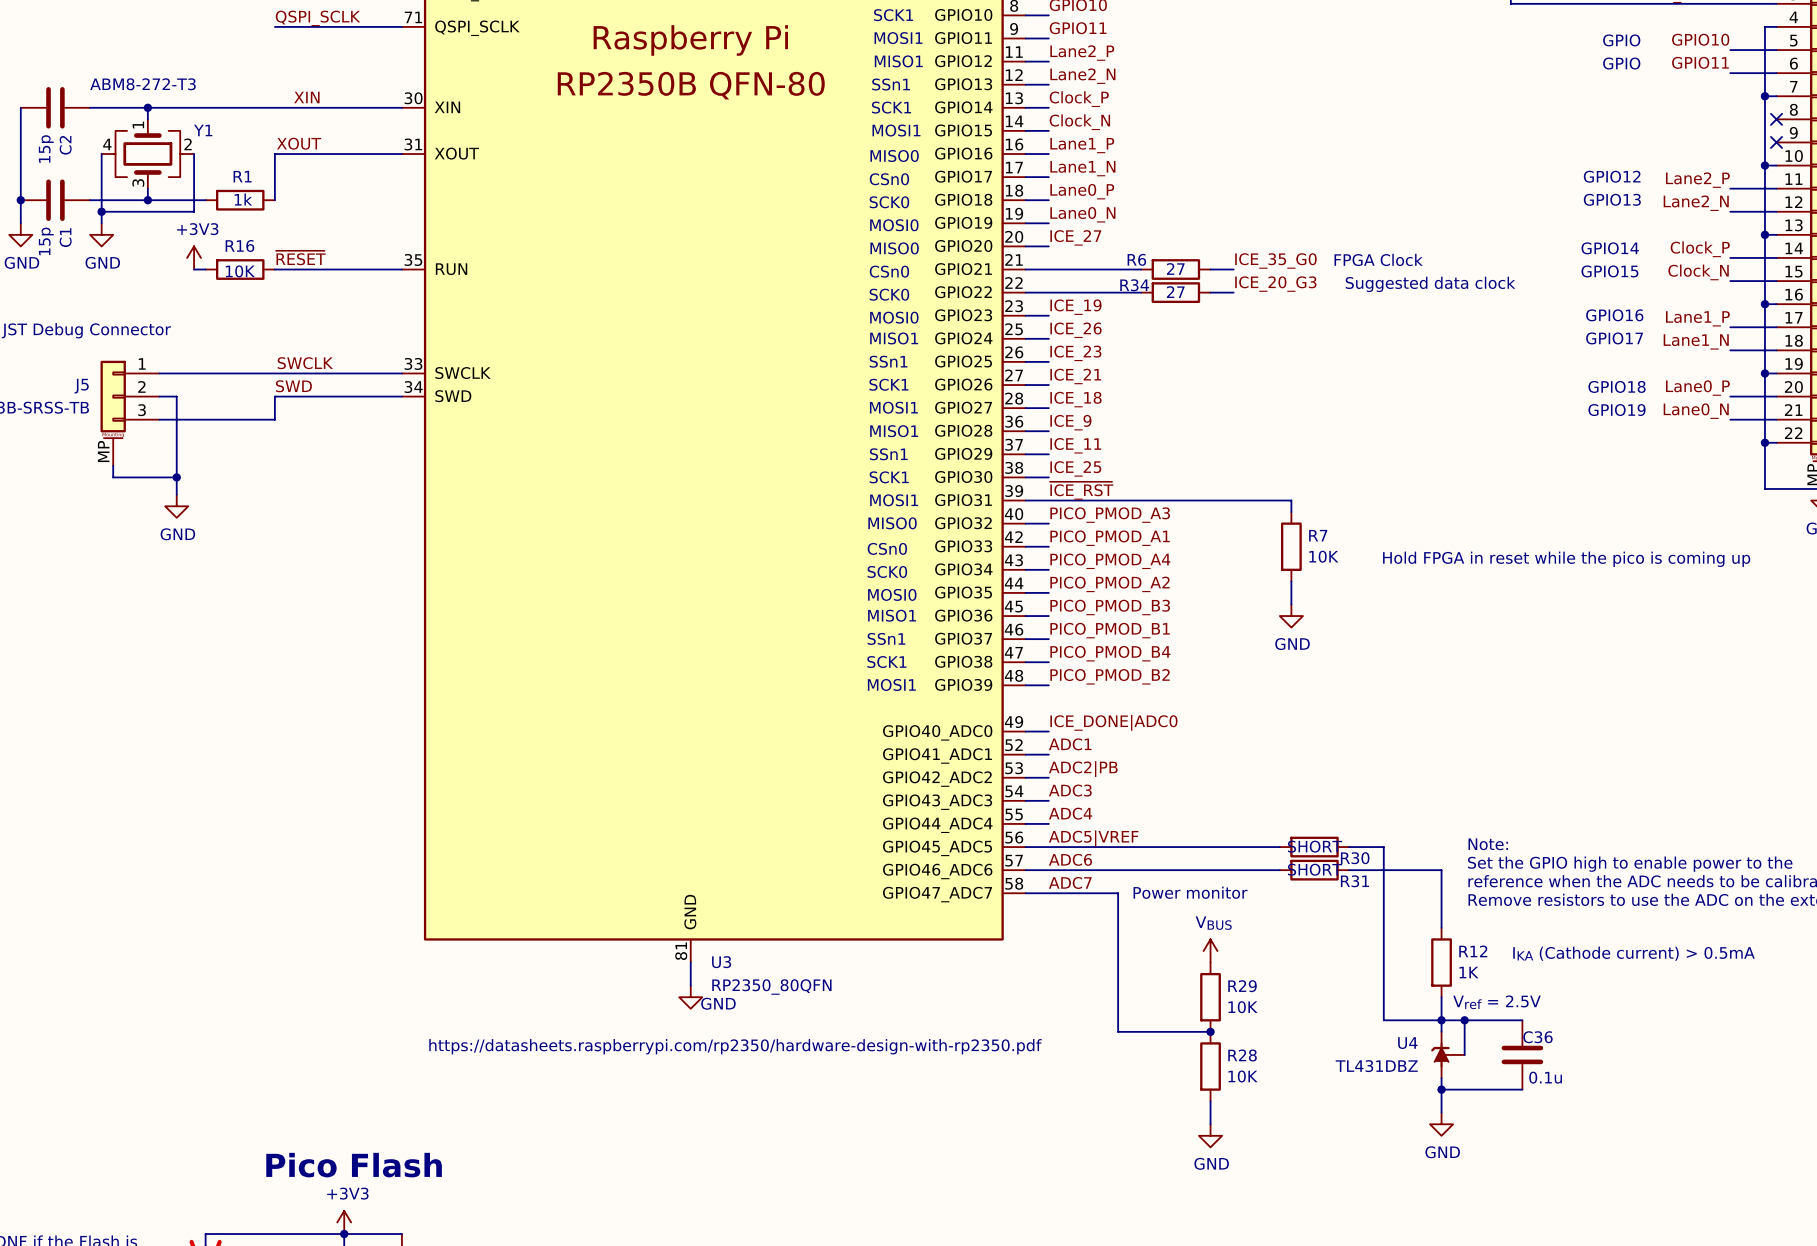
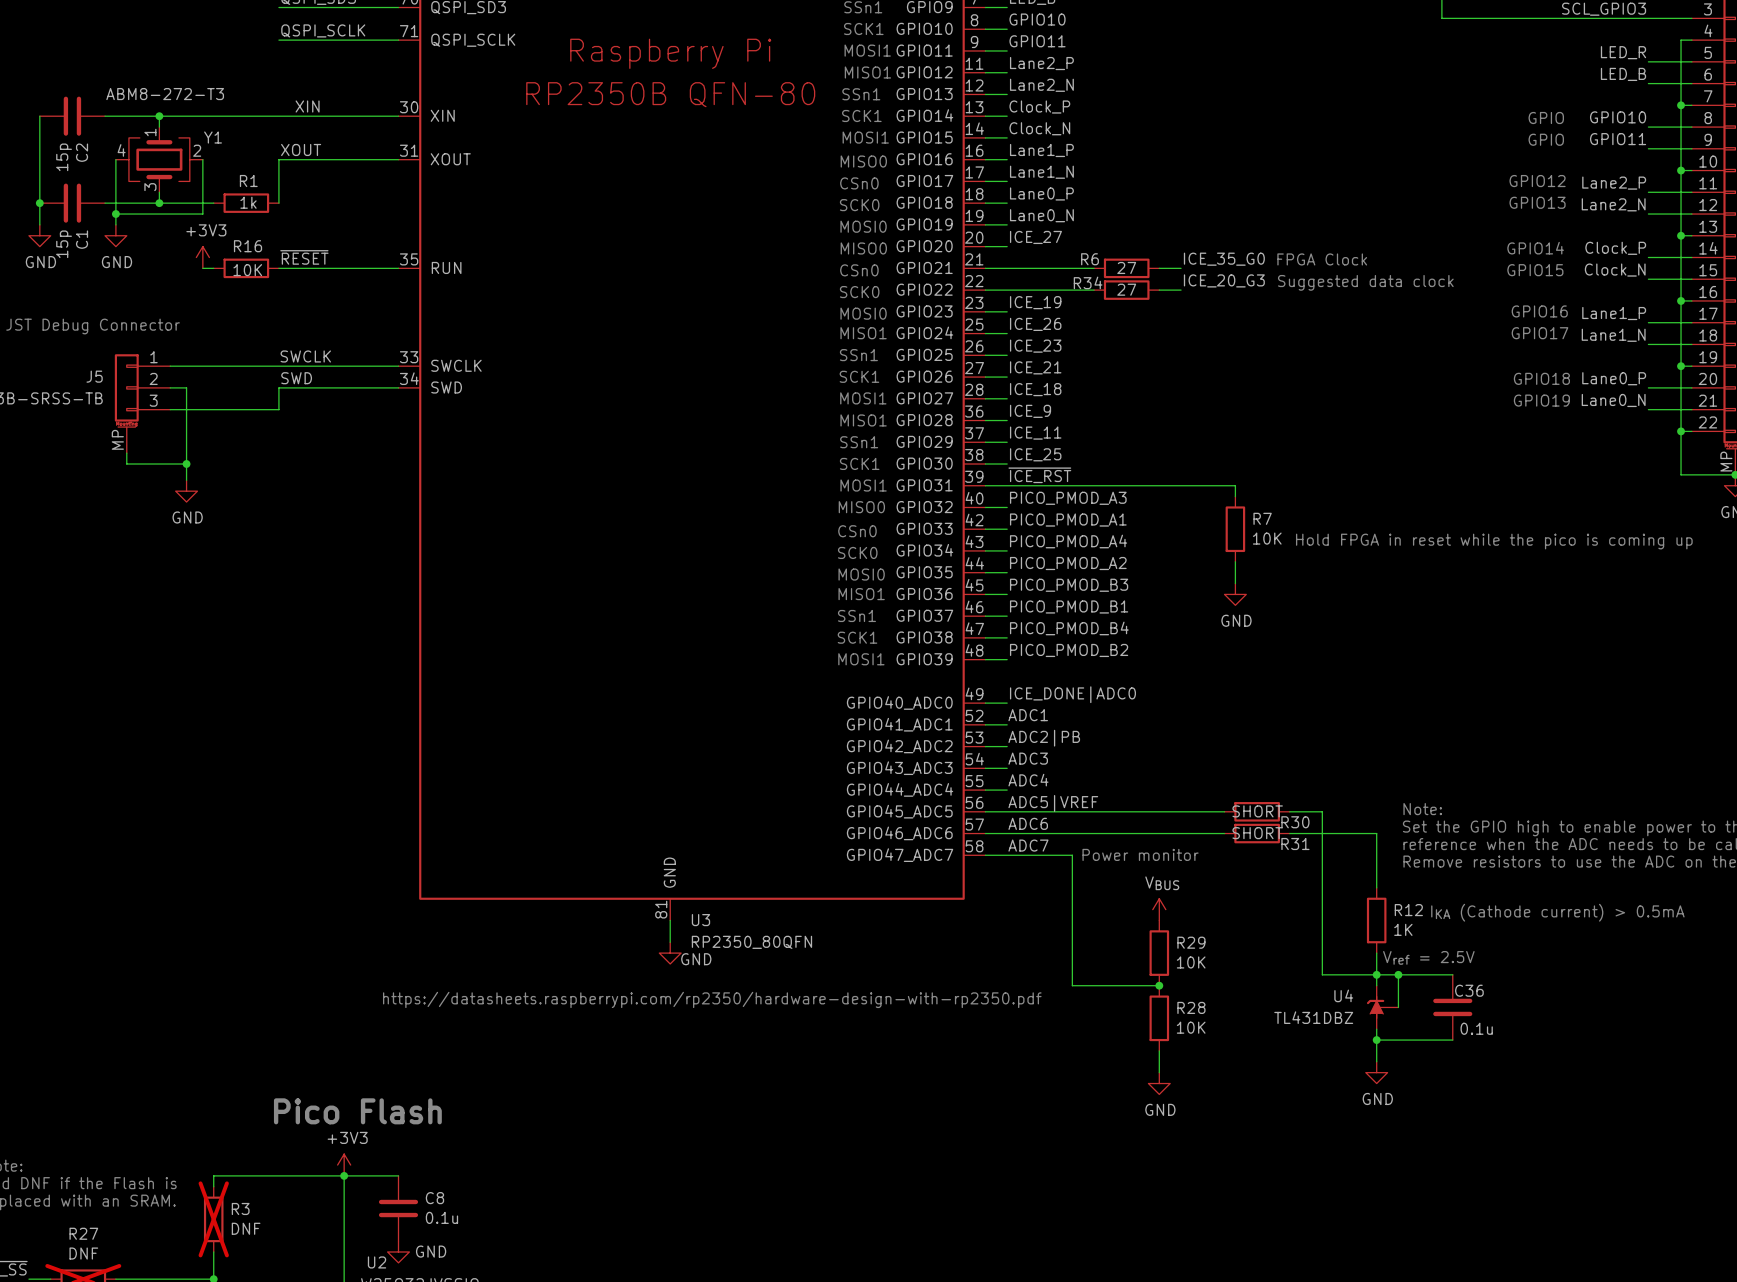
label: GPIO10 (1700, 39) -> LED_R (1623, 52)
text: GPIO (1621, 40) -> none
label: GPIO11 (1700, 62) -> LED_B (1623, 74)
text: GPIO (1621, 63) -> none
text: none -> GPIO (1546, 118)
label: none -> GPIO10 (1618, 117)
wire: none -> (1648, 127) (1691, 127)
no-connect mark: (1776, 119) -> none
text: none -> GPIO (1546, 139)
label: none -> GPIO11 (1618, 139)
wire: none -> (1648, 148) (1691, 148)
no-connect mark: (1776, 142) -> none

